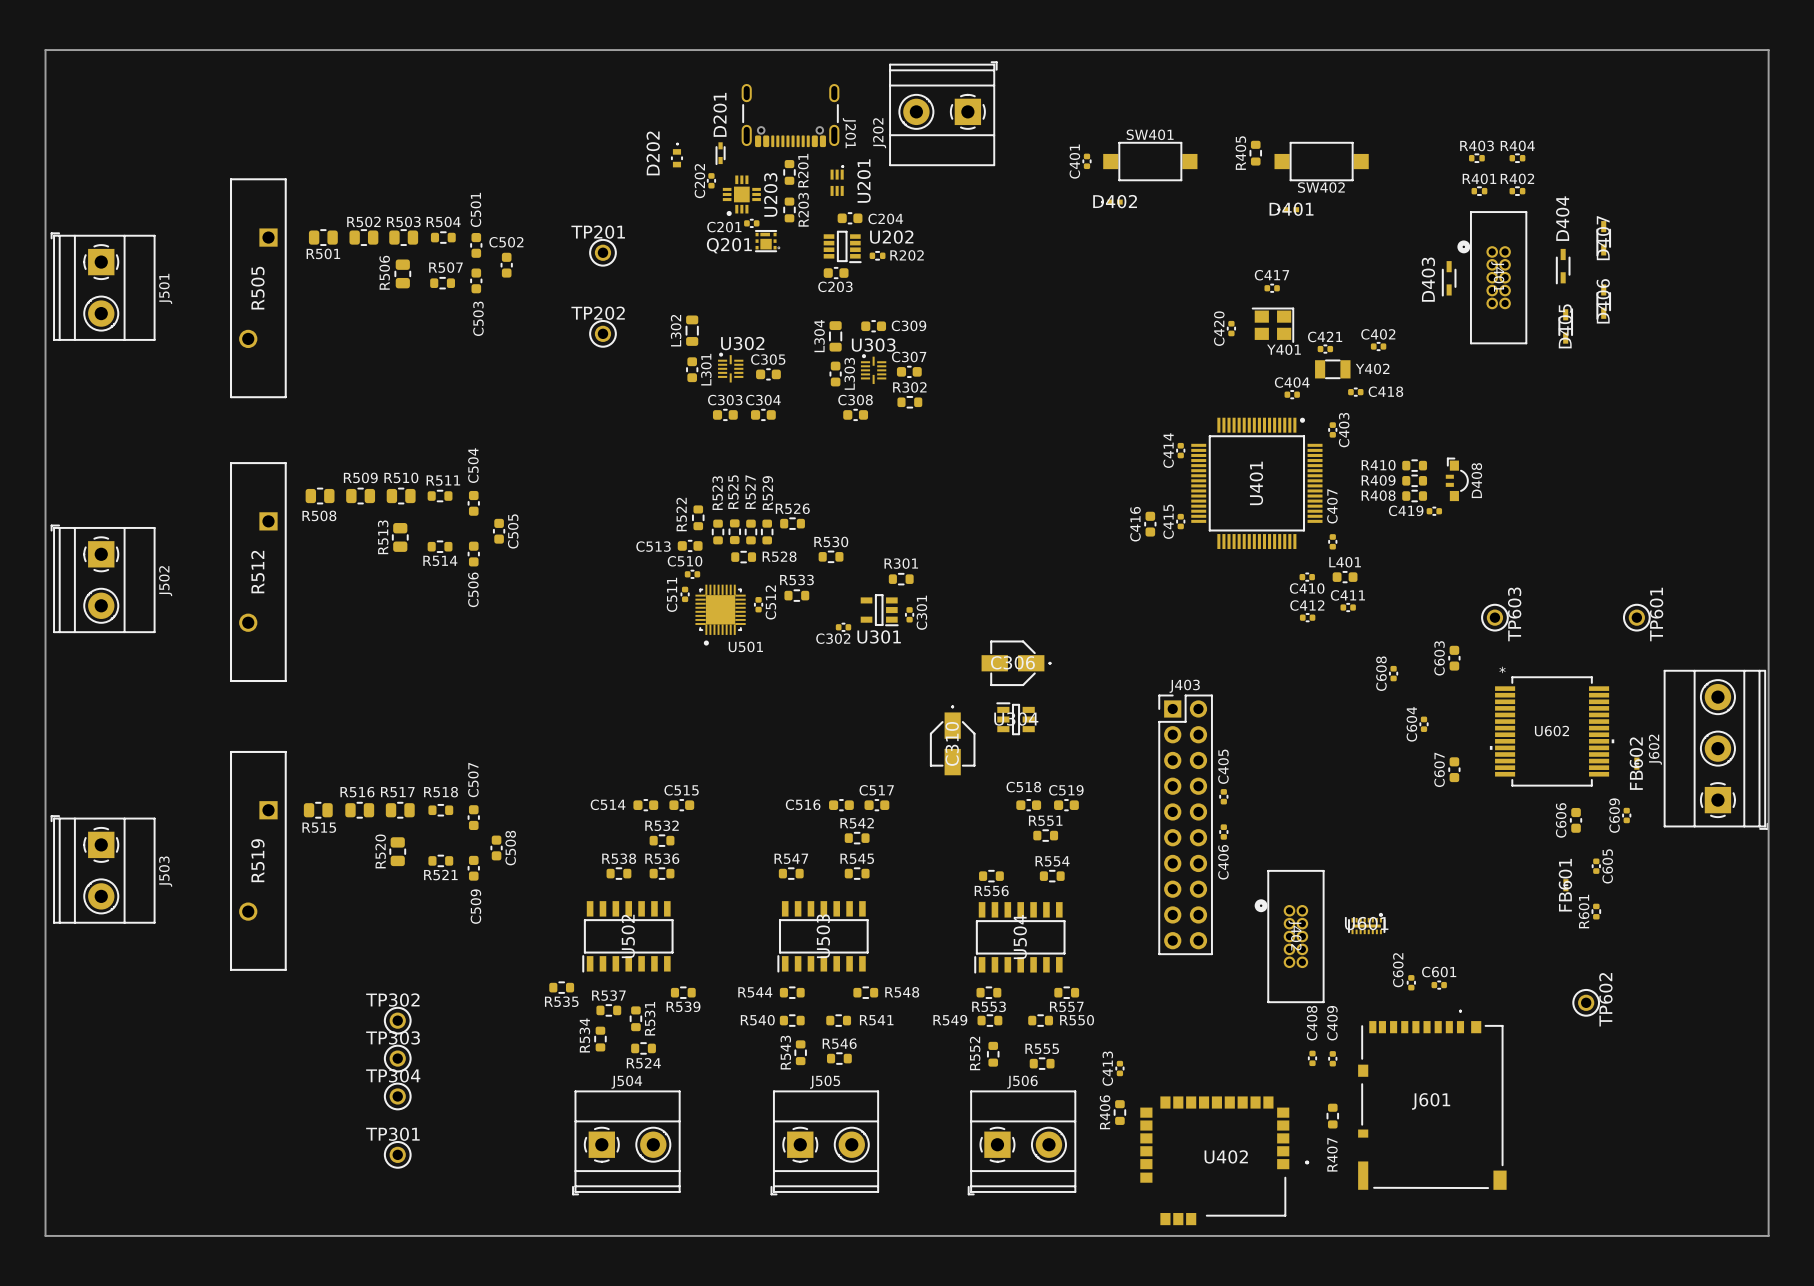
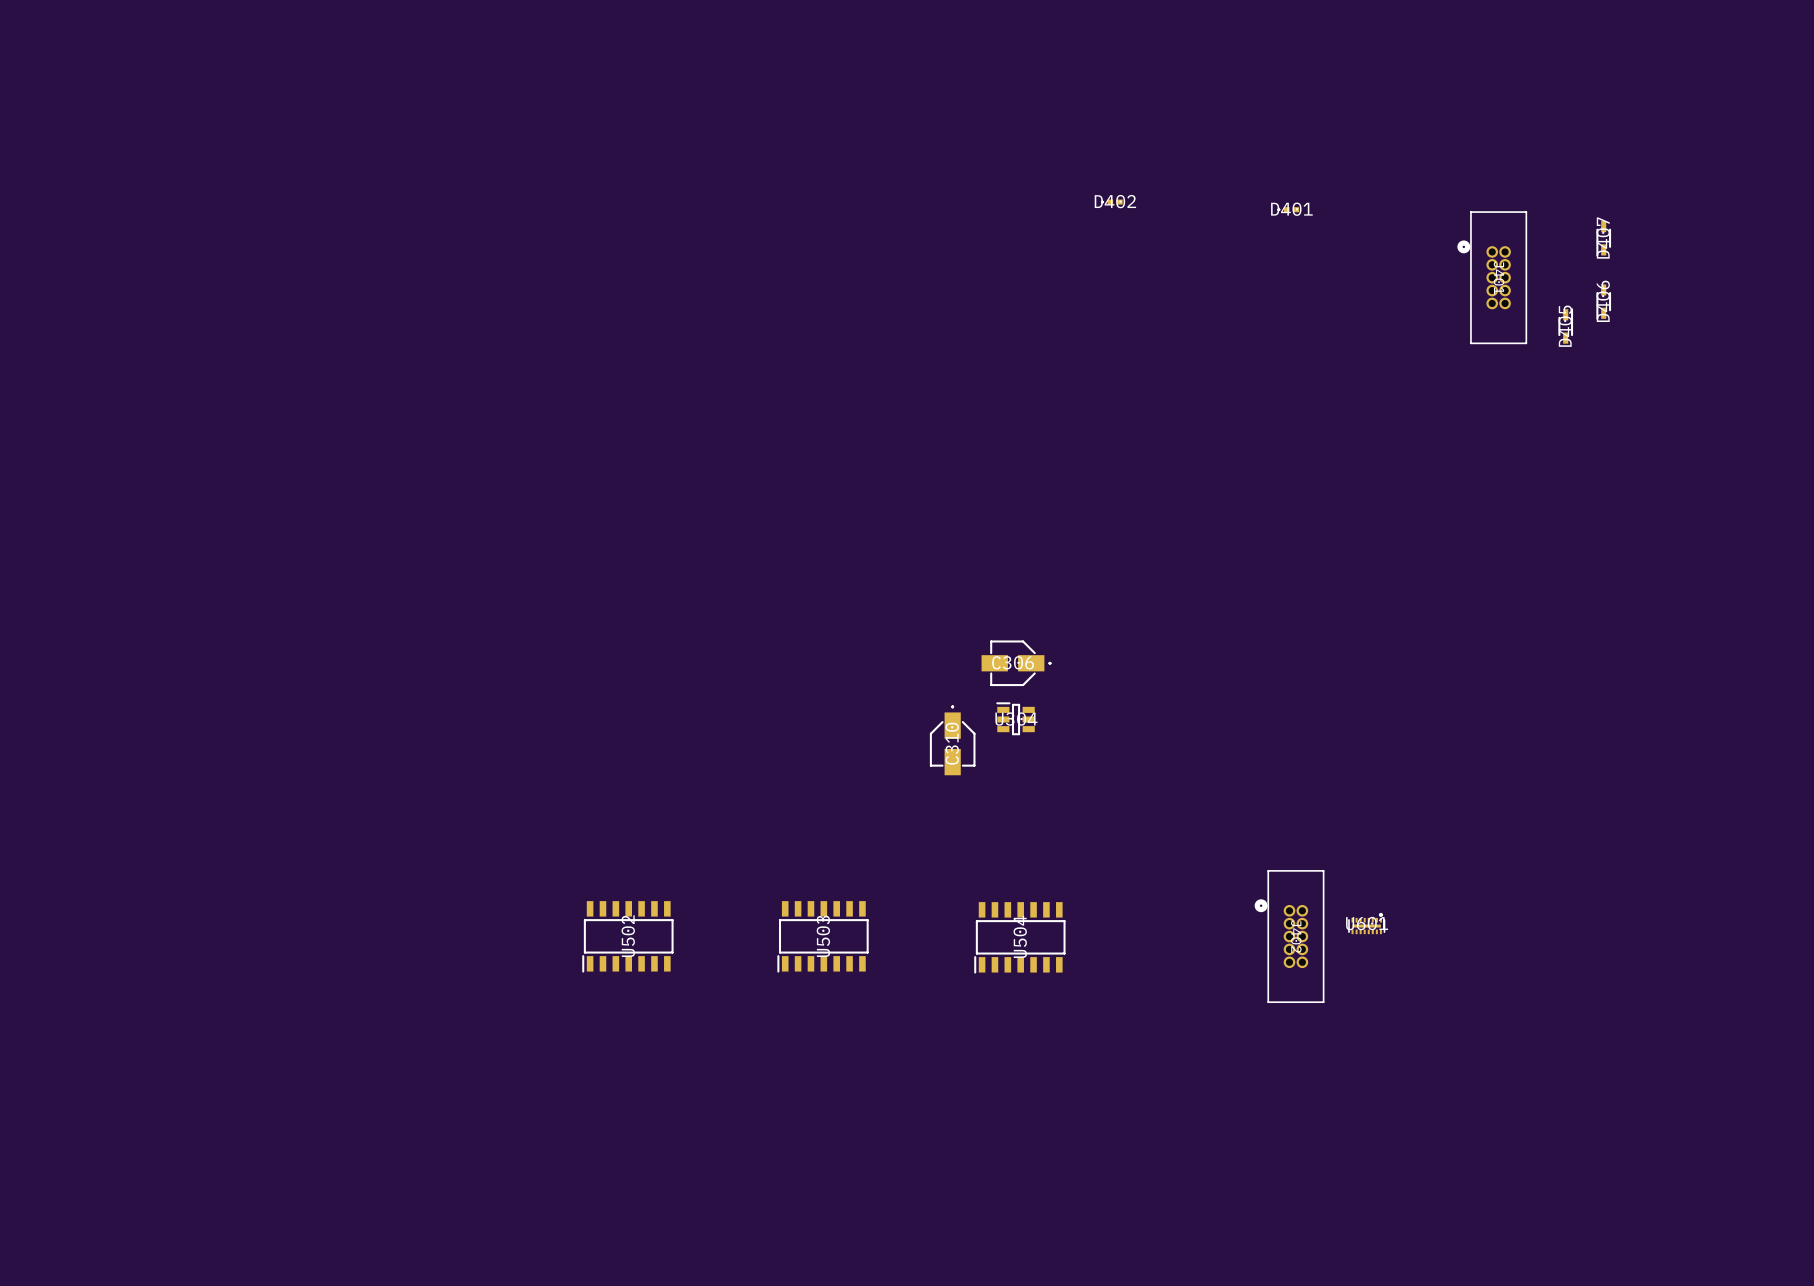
board edge: (45, 50) (45, 1235) (1768, 1235) (1768, 50) (45, 50) -> none
J202: (943, 113) -> none
J201: (790, 115) -> none
D201: (720, 153) -> none
R405: (1255, 153) -> none
D202: (676, 155) -> none
R403: (1476, 158) -> none
R404: (1517, 158) -> none
C401: (1086, 161) -> none
SW401: (1150, 161) -> none
SW402: (1321, 161) -> none
R201: (789, 172) -> none
C202: (711, 180) -> none
U201: (837, 180) -> none
R401: (1479, 191) -> none
R402: (1517, 191) -> none
U203: (741, 195) -> none
R203: (789, 209) -> none
C204: (850, 218) -> none
C201: (751, 223) -> none
R501: (323, 237) -> none
R502: (363, 237) -> none
R503: (403, 237) -> none
R504: (443, 237) -> none
Q201: (767, 241) -> none
C501: (476, 245) -> none
U202: (842, 246) -> none
TP201: (602, 252) -> none
R202: (877, 255) -> none
C502: (506, 265) -> none
D404: (1563, 266) -> none
R506: (402, 273) -> none
C203: (836, 273) -> none
D403: (1449, 278) -> none
C503: (476, 280) -> none
R507: (442, 283) -> none
J501: (103, 286) -> none
R505: (258, 288) -> none
C417: (1272, 288) -> none
Y401: (1272, 325) -> none
C309: (873, 326) -> none
C420: (1231, 328) -> none
L302: (692, 330) -> none
TP202: (602, 333) -> none
L304: (835, 336) -> none
C402: (1378, 346) -> none
C421: (1325, 349) -> none
U302: (730, 367) -> none
L301: (692, 369) -> none
U303: (873, 369) -> none
Y402: (1332, 369) -> none
C307: (909, 371) -> none
C305: (768, 374) -> none
L303: (835, 374) -> none
C418: (1355, 392) -> none
C404: (1292, 394) -> none
R302: (909, 402) -> none
C303: (725, 414) -> none
C304: (763, 414) -> none
C308: (855, 414) -> none
C403: (1332, 429) -> none
C414: (1180, 450) -> none
R410: (1414, 465) -> none
D408: (1457, 479) -> none
R409: (1414, 480) -> none
U401: (1256, 483) -> none
R508: (320, 496) -> none
R509: (360, 496) -> none
R510: (401, 496) -> none
R511: (440, 496) -> none
R408: (1414, 496) -> none
C504: (473, 503) -> none
C419: (1434, 511) -> none
R522: (698, 517) -> none
C415: (1180, 521) -> none
R526: (792, 523) -> none
C416: (1150, 524) -> none
C505: (499, 531) -> none
R525: (734, 531) -> none
R523: (718, 532) -> none
R527: (750, 532) -> none
R529: (767, 532) -> none
R513: (400, 537) -> none
C407: (1332, 541) -> none
C513: (690, 545) -> none
R514: (440, 546) -> none
C506: (473, 554) -> none
R530: (831, 556) -> none
R528: (743, 557) -> none
R512: (258, 572) -> none
C510: (692, 574) -> none
C410: (1307, 577) -> none
L401: (1345, 577) -> none
J502: (103, 578) -> none
R301: (901, 579) -> none
C511: (685, 594) -> none
R533: (796, 595) -> none
C512: (758, 604) -> none
C411: (1348, 607) -> none
U301: (879, 610) -> none
C301: (909, 614) -> none
U501: (720, 615) -> none
C412: (1307, 617) -> none
TP603: (1494, 617) -> none
TP601: (1636, 617) -> none
C302: (843, 627) -> none
C603: (1454, 658) -> none
C608: (1393, 673) -> none
C604: (1424, 724) -> none
U602: (1552, 731) -> none
J602: (1716, 749) -> none
FB602: (1636, 763) -> none
C607: (1454, 769) -> none
C405: (1223, 796) -> none
C514: (645, 805) -> none
C515: (681, 805) -> none
C516: (841, 805) -> none
C517: (876, 805) -> none
C518: (1028, 805) -> none
C519: (1066, 805) -> none
R515: (318, 810) -> none
R516: (359, 810) -> none
R517: (400, 810) -> none
R518: (440, 810) -> none
C609: (1626, 815) -> none
C507: (473, 817) -> none
C606: (1576, 820) -> none
J403: (1185, 824) -> none
C406: (1223, 832) -> none
R551: (1045, 835) -> none
R542: (857, 838) -> none
R532: (662, 840) -> none
C508: (496, 847) -> none
R520: (397, 851) -> none
R519: (258, 860) -> none
R521: (440, 860) -> none
C605: (1596, 866) -> none
C509: (473, 868) -> none
J503: (103, 869) -> none
R538: (618, 873) -> none
R536: (662, 873) -> none
R547: (791, 873) -> none
R545: (857, 873) -> none
R556: (991, 876) -> none
R554: (1052, 876) -> none
FB601: (1565, 885) -> none
R601: (1596, 911) -> none
C602: (1411, 982) -> none
C601: (1439, 985) -> none
R535: (561, 987) -> none
R539: (683, 992) -> none
R544: (792, 992) -> none
R548: (865, 992) -> none
R553: (988, 992) -> none
R557: (1066, 992) -> none
TP602: (1586, 1002) -> none
R537: (608, 1010) -> none
R531: (635, 1018) -> none
TP302: (397, 1020) -> none
R540: (792, 1020) -> none
R541: (838, 1020) -> none
R549: (989, 1020) -> none
R550: (1040, 1020) -> none
R534: (600, 1039) -> none
R524: (643, 1048) -> none
R543: (800, 1052) -> none
R552: (993, 1054) -> none
TP303: (397, 1058) -> none
R546: (839, 1058) -> none
C408: (1312, 1058) -> none
C409: (1332, 1058) -> none
R555: (1042, 1063) -> none
C413: (1119, 1068) -> none
TP304: (397, 1096) -> none
J601: (1432, 1099) -> none
R406: (1119, 1112) -> none
R407: (1332, 1116) -> none
J504: (626, 1142) -> none
J505: (824, 1142) -> none
J506: (1022, 1142) -> none
TP301: (397, 1154) -> none
U402: (1224, 1160) -> none

